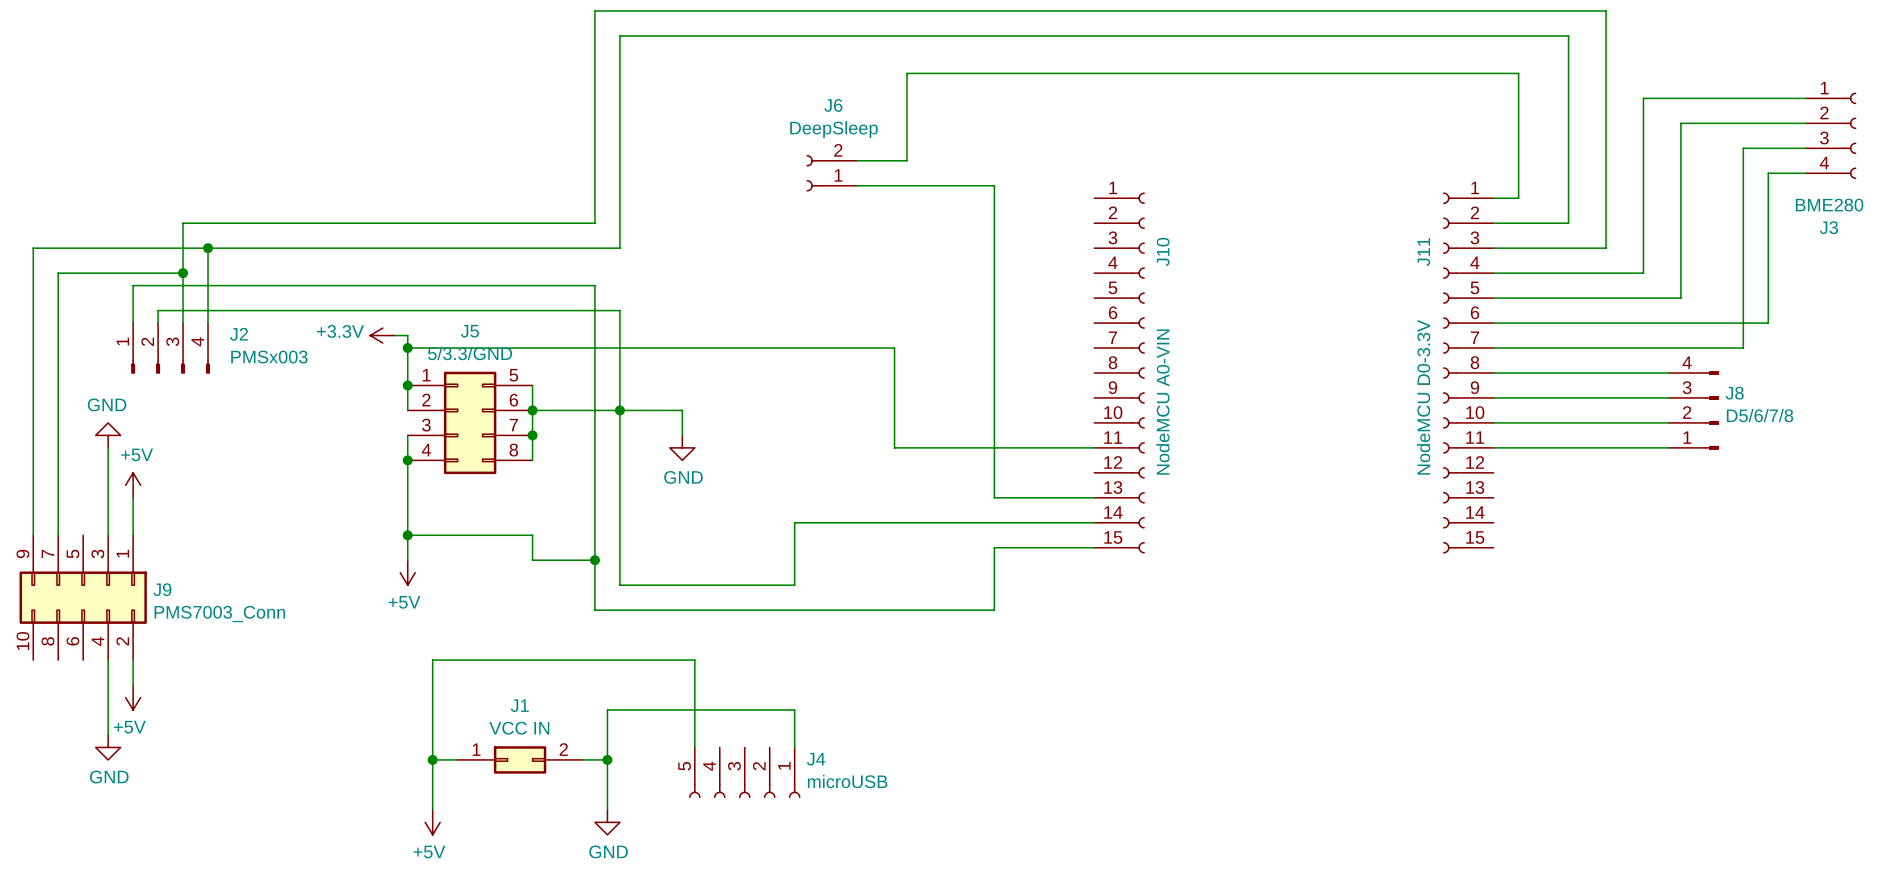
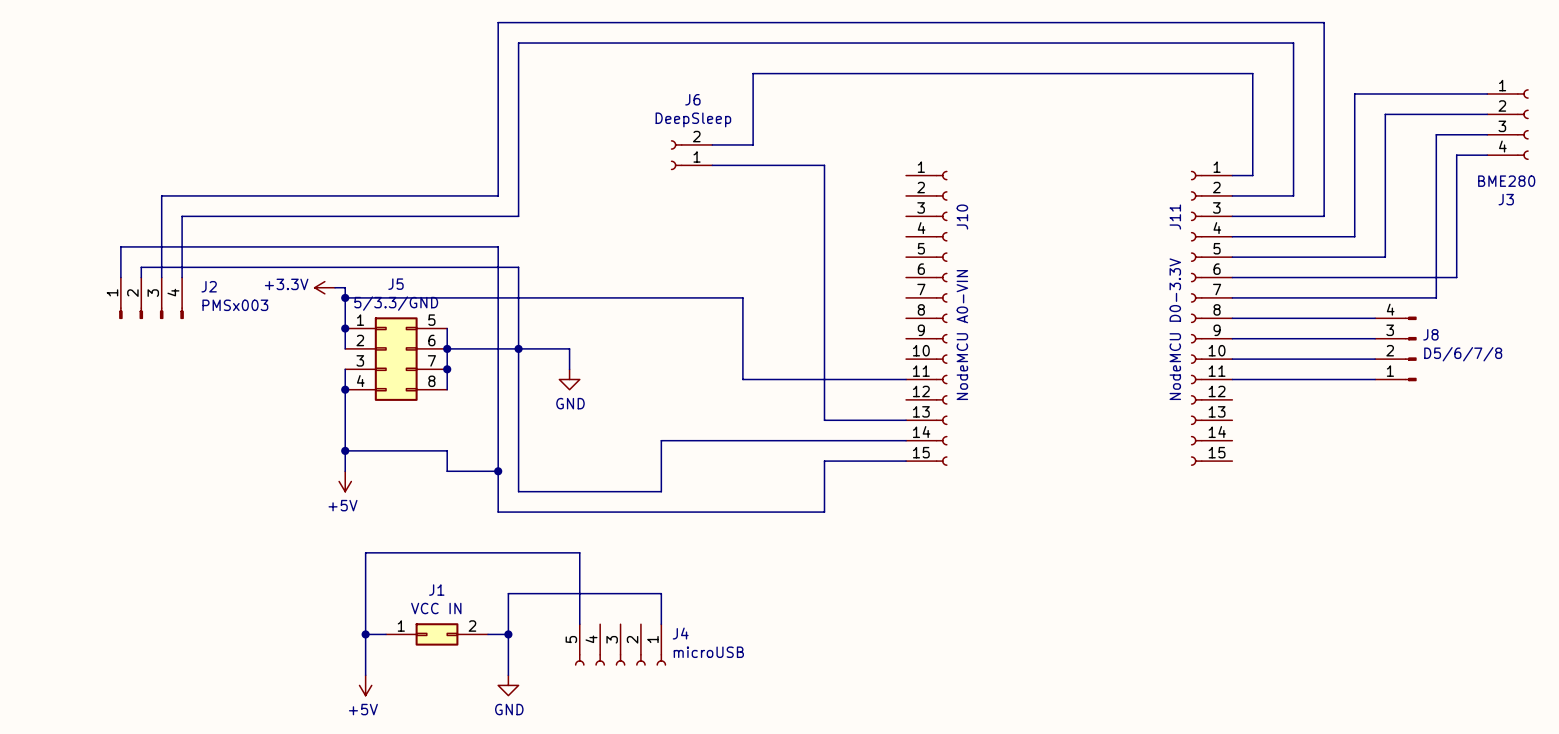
wire: (208, 248) (33, 248) (33, 535) -> none
junction: (208, 248) -> none
wire: (183, 273) (58, 273) (58, 535) -> none
junction: (183, 273) -> none
power symbol: GND (108, 435) -> none
wire: (108, 447) (108, 535) -> none
power symbol: +5V (133, 485) -> none
wire: (133, 497) (133, 535) -> none
J9: PMS7003_Conn (83, 597) -> none
wire: (108, 660) (108, 734) -> none
wire: (133, 660) (133, 685) -> none
power symbol: +5V (133, 697) -> none
power symbol: GND (108, 747) -> none

